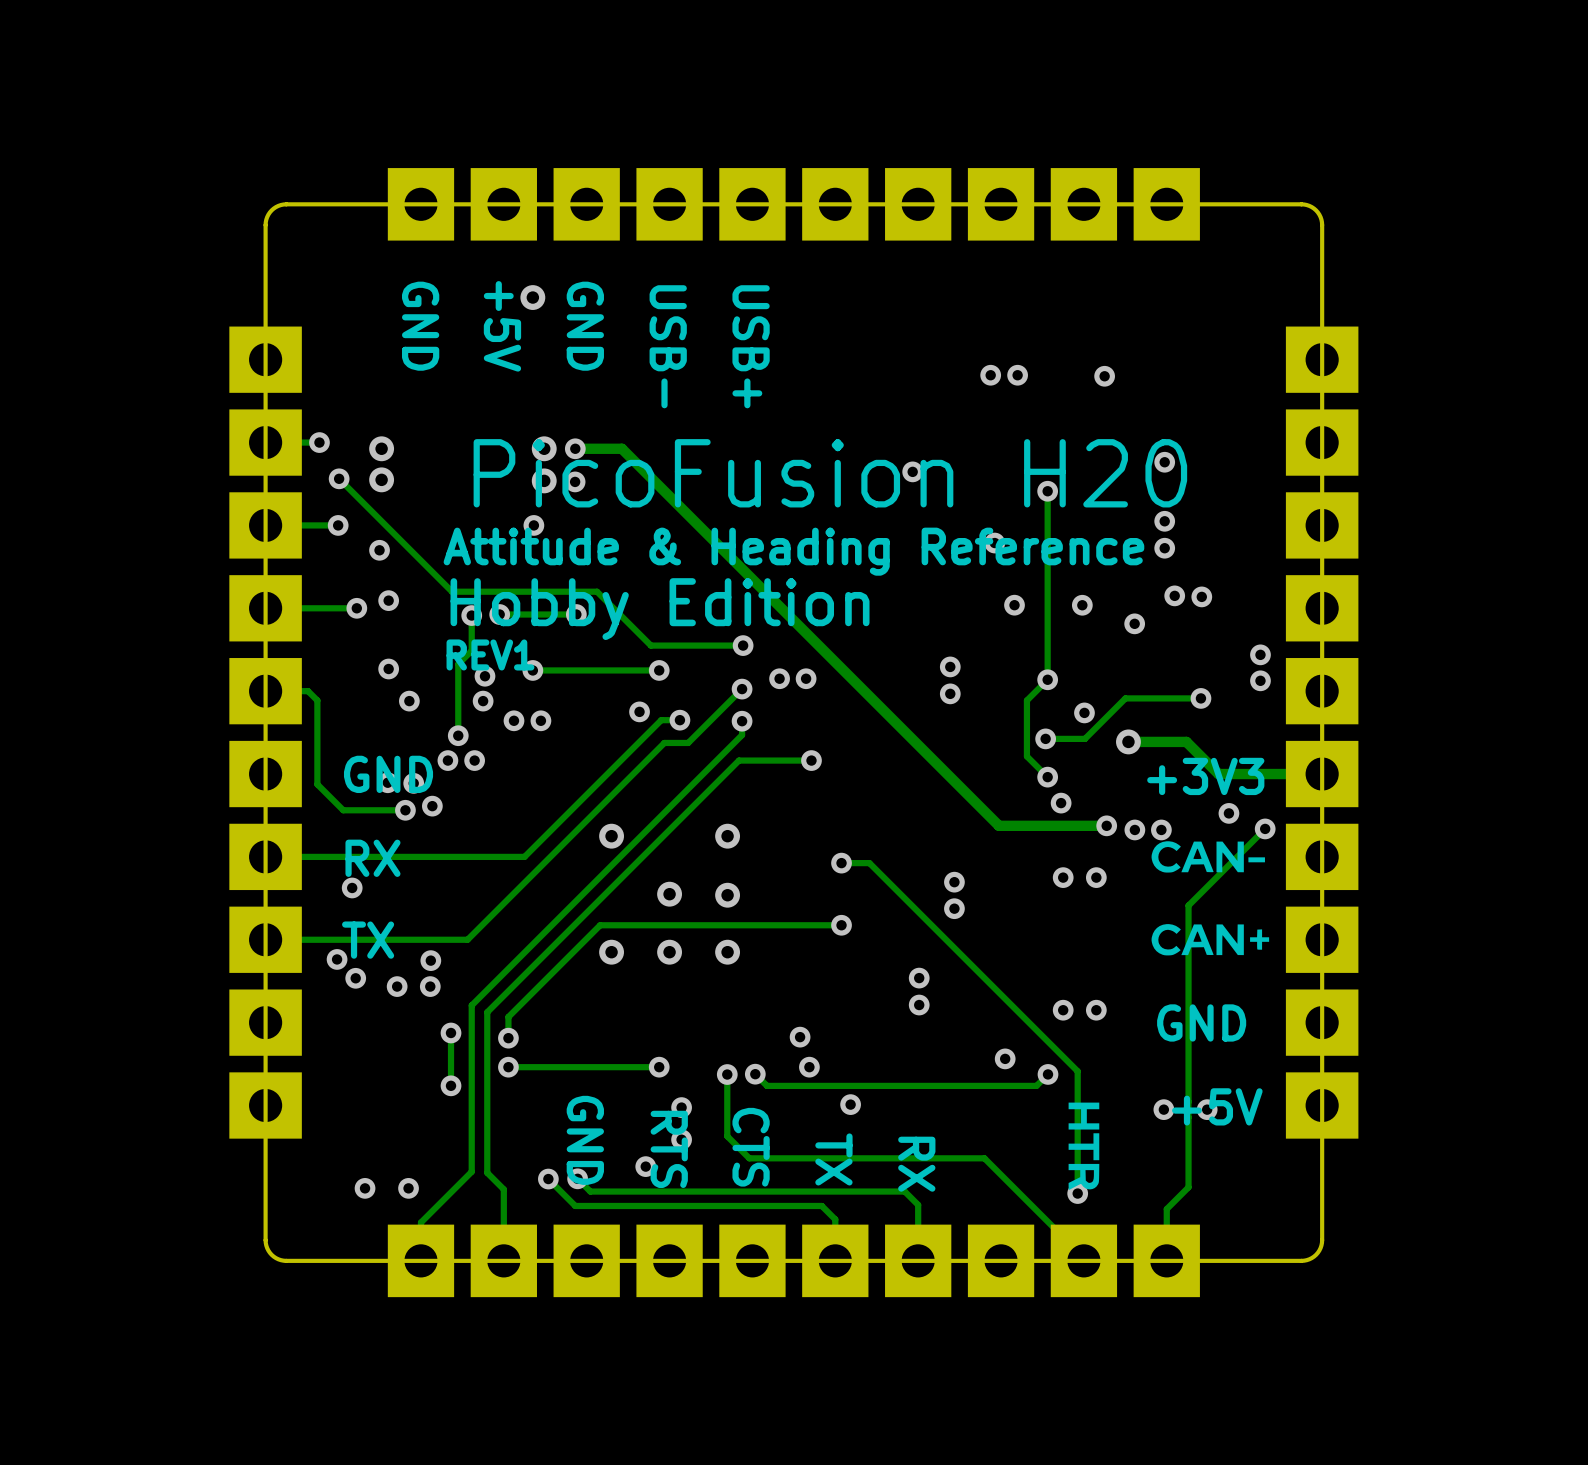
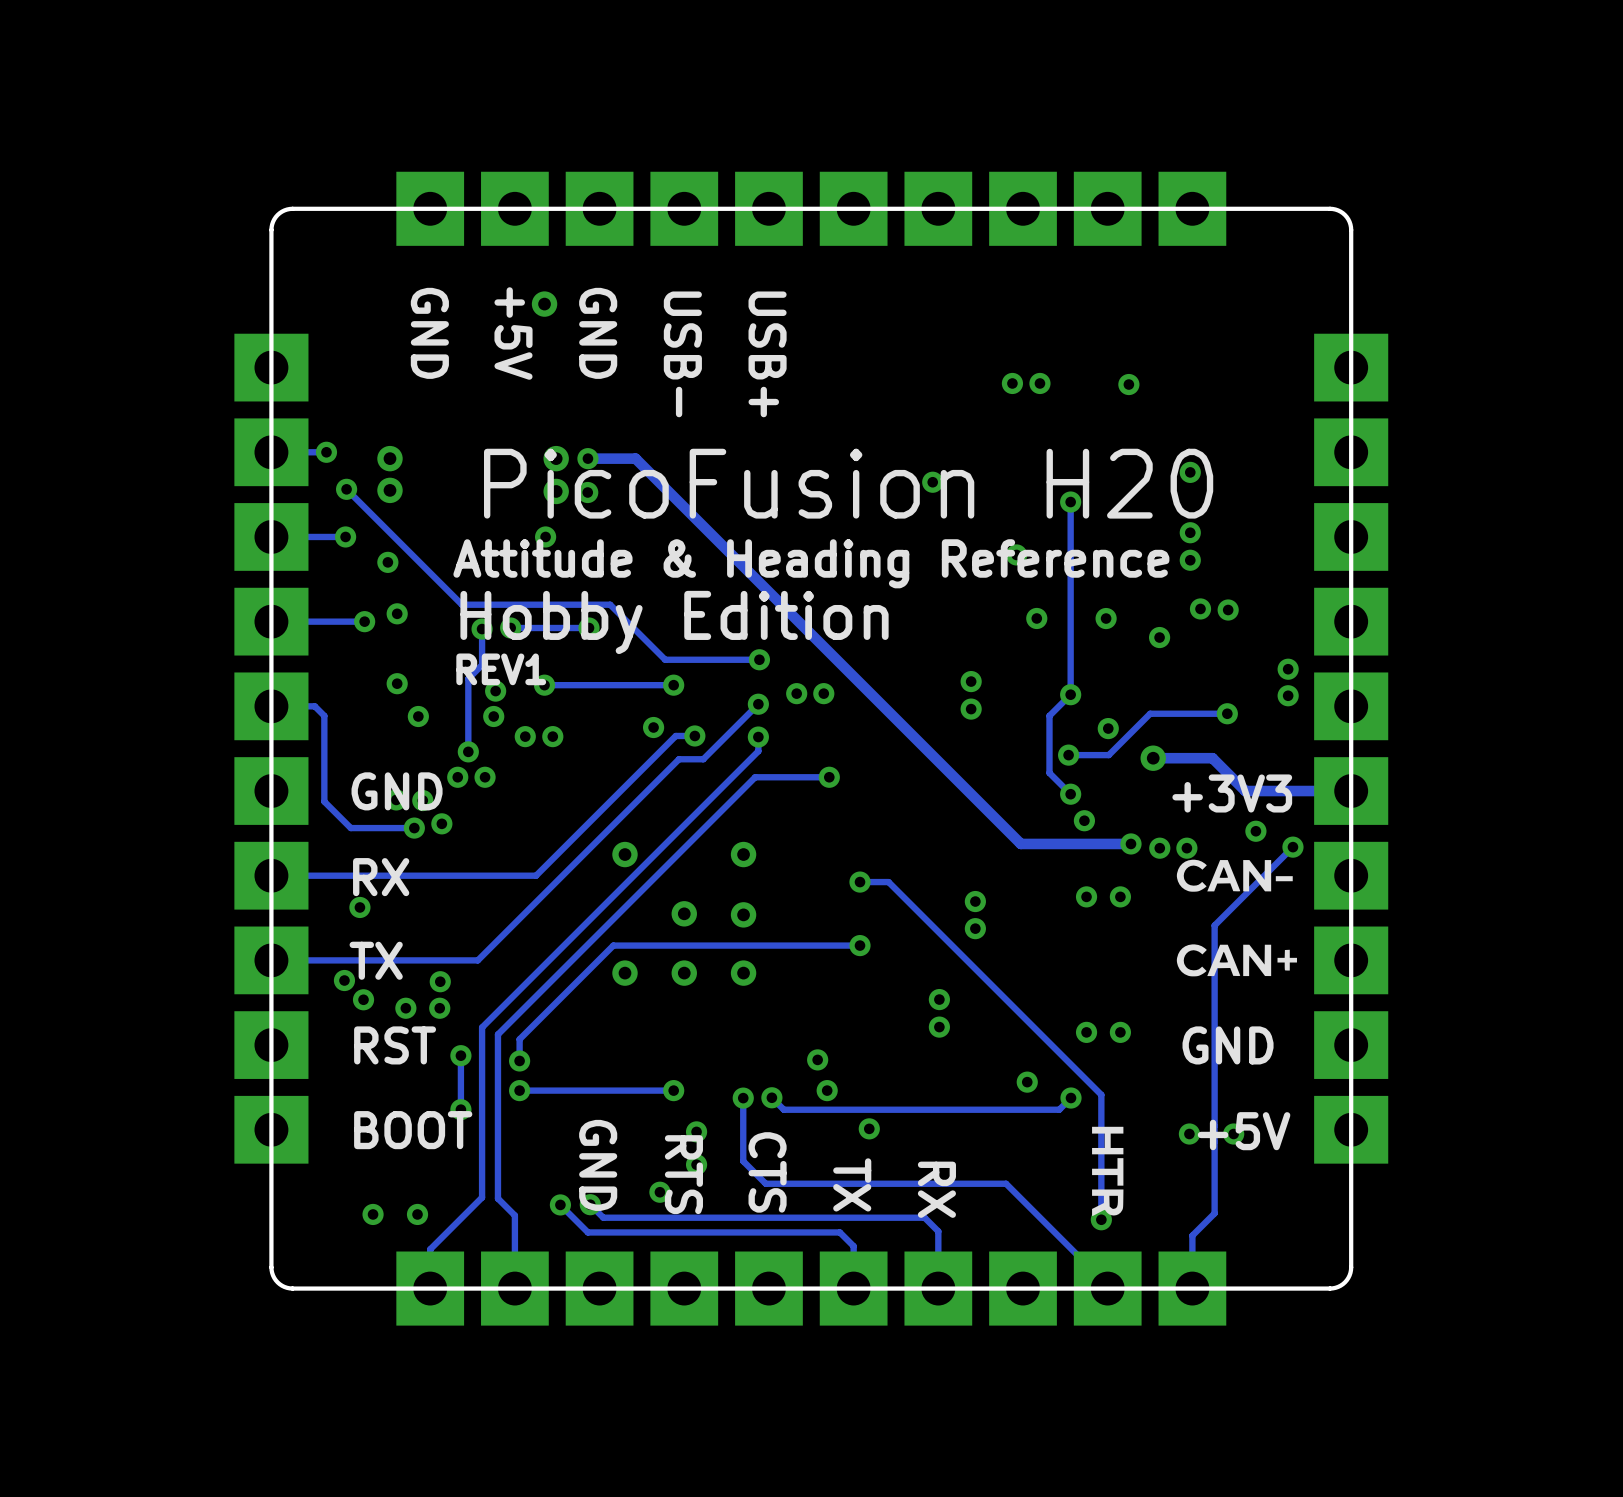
text: none -> RST (395, 1045)
text: none -> BOOT (413, 1130)

